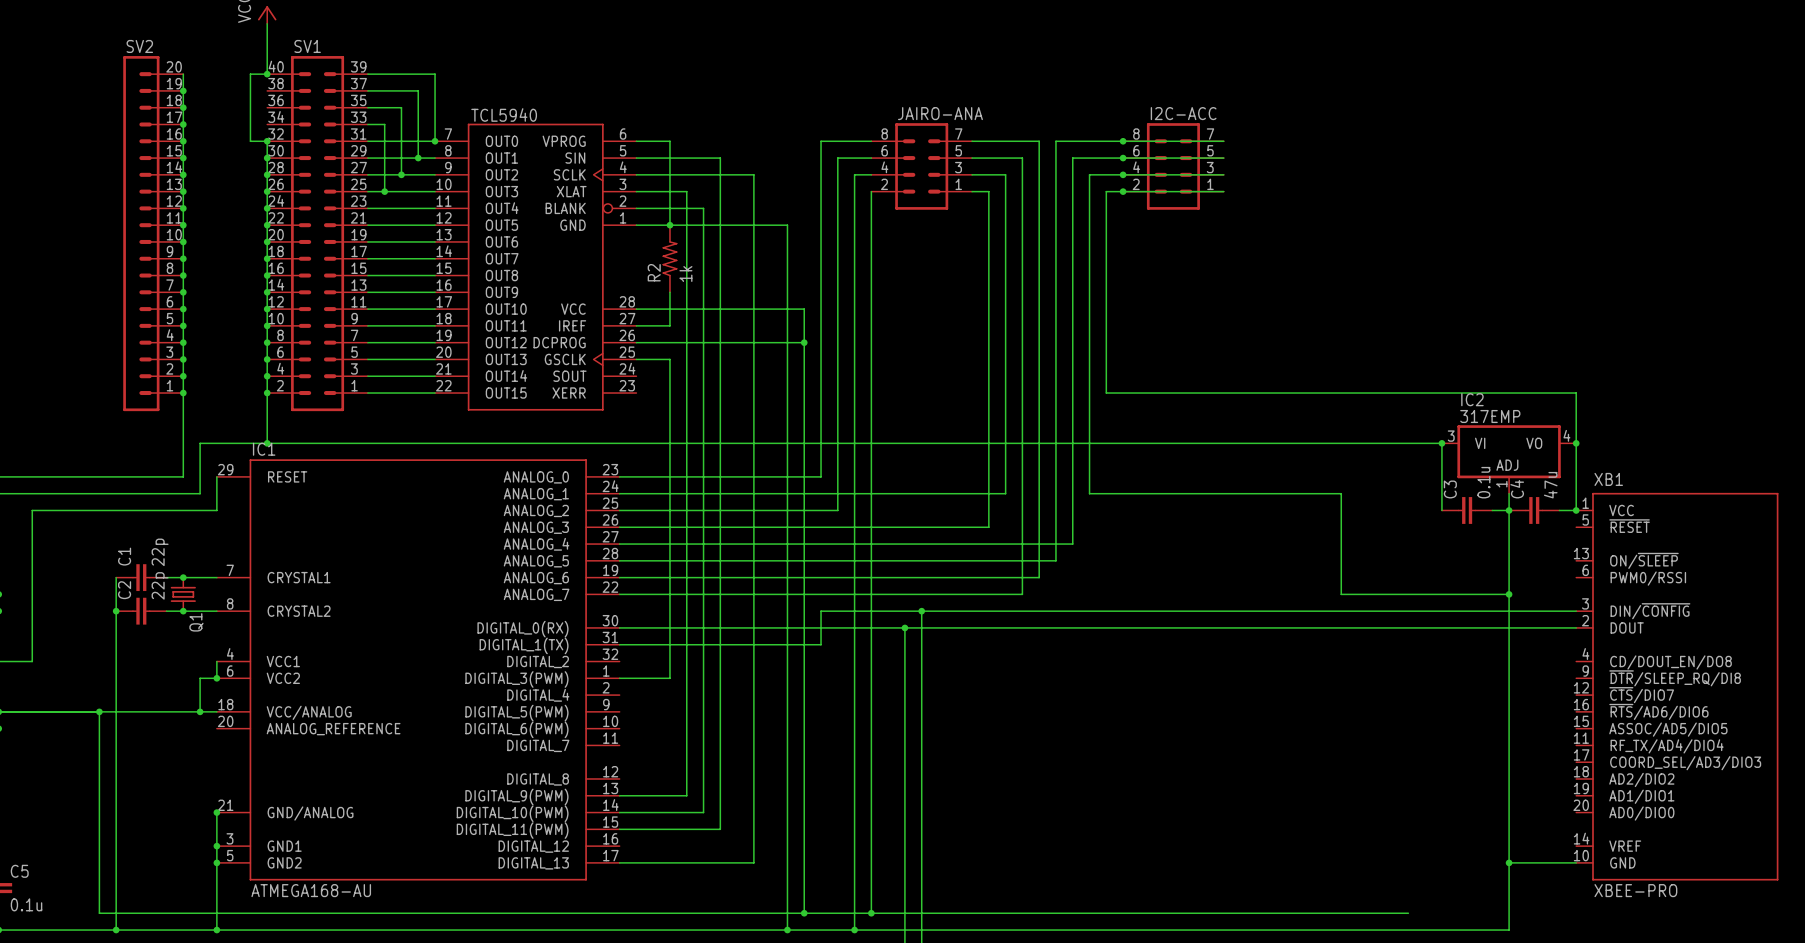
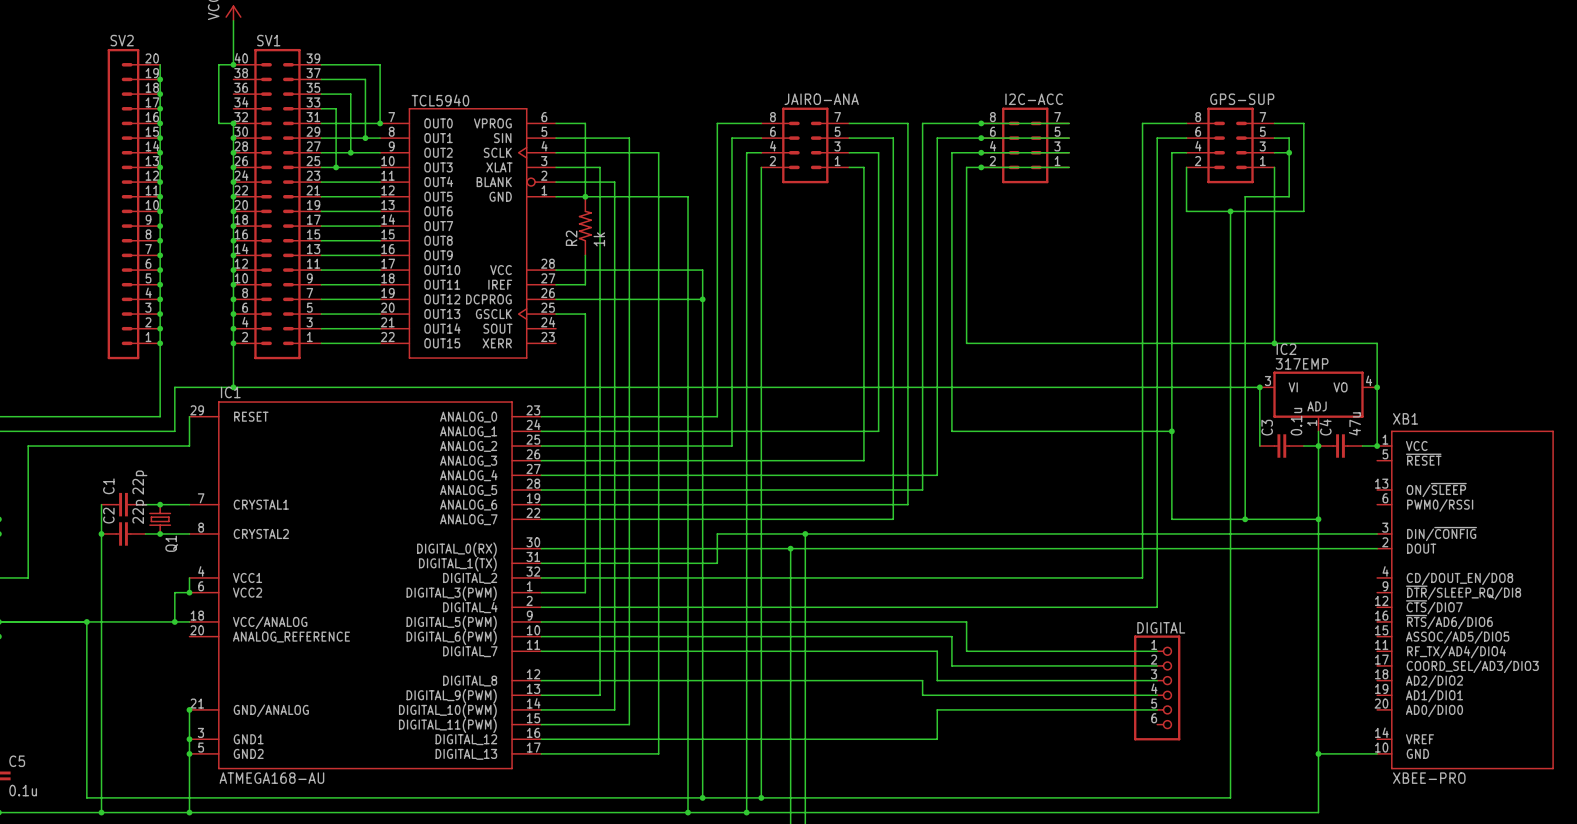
wire: none -> (1186, 123) (1142, 123) (1142, 577) (541, 577)
wire: none -> (1274, 123) (1303, 123) (1303, 211) (1186, 211) (1186, 167)
wire: none -> (1186, 138) (1157, 138) (1157, 607) (541, 607)
wire: none -> (1274, 138) (1289, 138) (1289, 196) (1245, 196) (1245, 519)
GPS-SUP: none -> (1230, 145)
wire: none -> (1186, 152) (1171, 152) (1171, 431)
wire: none -> (1274, 152) (1289, 152)
junction: none -> (1289, 152)
wire: none -> (1274, 167) (1274, 343)
wire: none -> (1230, 211) (1230, 797)
junction: none -> (1230, 211)
junction: none -> (1274, 343)
junction: none -> (1171, 431)
junction: none -> (1245, 519)
wire: none -> (541, 621) (966, 621) (966, 651) (1157, 651)
wire: none -> (541, 636) (951, 636) (951, 665) (1157, 665)
wire: none -> (541, 651) (937, 651) (937, 680) (1157, 680)
wire: none -> (541, 680) (922, 680) (922, 695) (1157, 695)
DIGITAL: none -> (1157, 687)
wire: none -> (1157, 709) (937, 709) (937, 739) (541, 739)

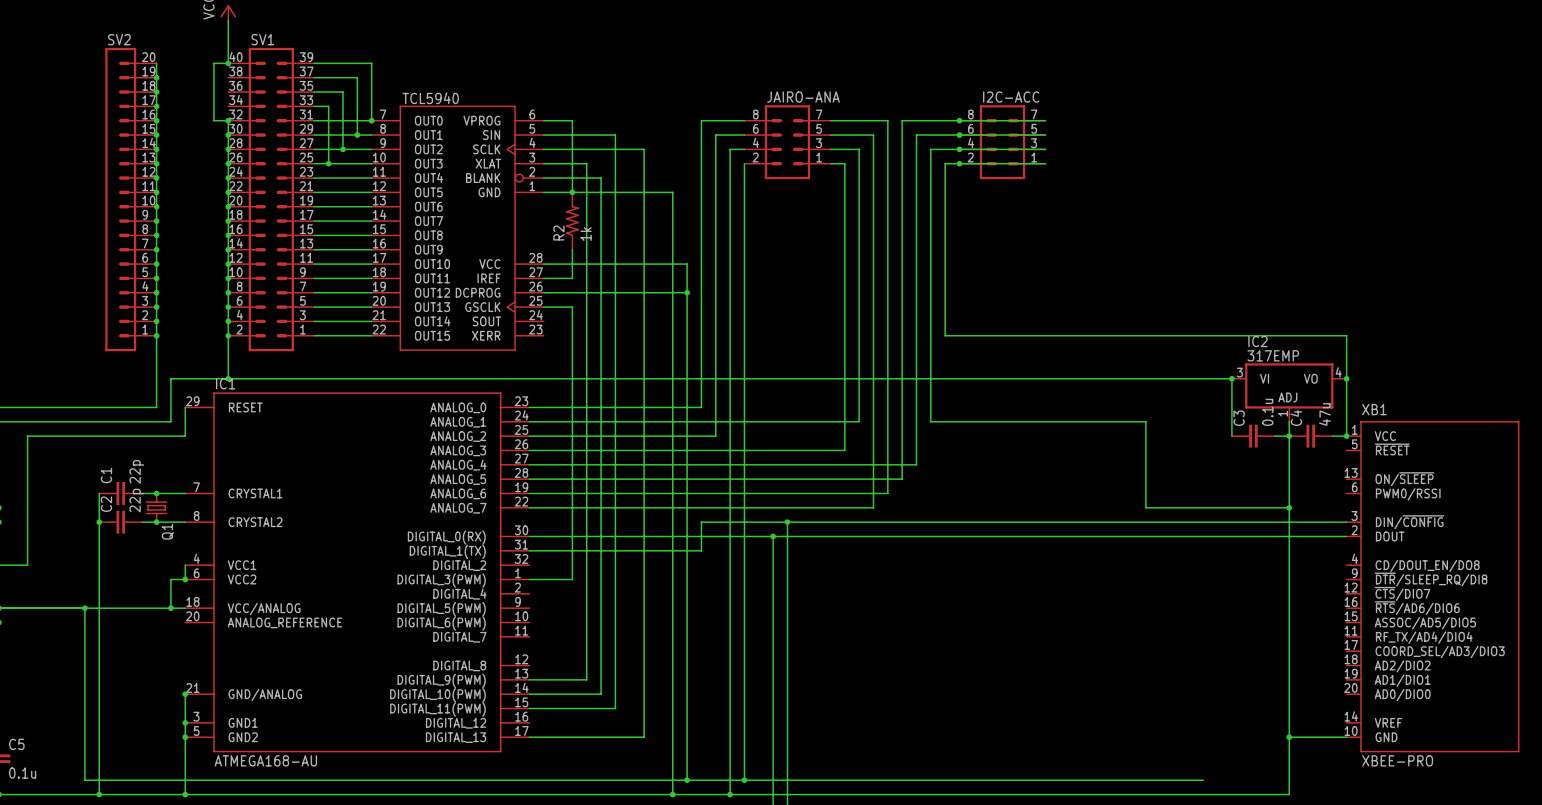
wire: (1186, 123) (1142, 123) (1142, 577) (541, 577) -> none
wire: (1274, 123) (1303, 123) (1303, 211) (1186, 211) (1186, 167) -> none
wire: (1186, 138) (1157, 138) (1157, 607) (541, 607) -> none
wire: (1274, 138) (1289, 138) (1289, 196) (1245, 196) (1245, 519) -> none
GPS-SUP: (1230, 145) -> none
wire: (1186, 152) (1171, 152) (1171, 431) -> none
wire: (1274, 152) (1289, 152) -> none
junction: (1289, 152) -> none
wire: (1274, 167) (1274, 343) -> none
wire: (1230, 211) (1230, 797) -> none
junction: (1230, 211) -> none
junction: (1274, 343) -> none
junction: (1171, 431) -> none
junction: (1245, 519) -> none
wire: (541, 621) (966, 621) (966, 651) (1157, 651) -> none
wire: (541, 636) (951, 636) (951, 665) (1157, 665) -> none
wire: (541, 651) (937, 651) (937, 680) (1157, 680) -> none
wire: (541, 680) (922, 680) (922, 695) (1157, 695) -> none
DIGITAL: (1157, 687) -> none
wire: (1157, 709) (937, 709) (937, 739) (541, 739) -> none

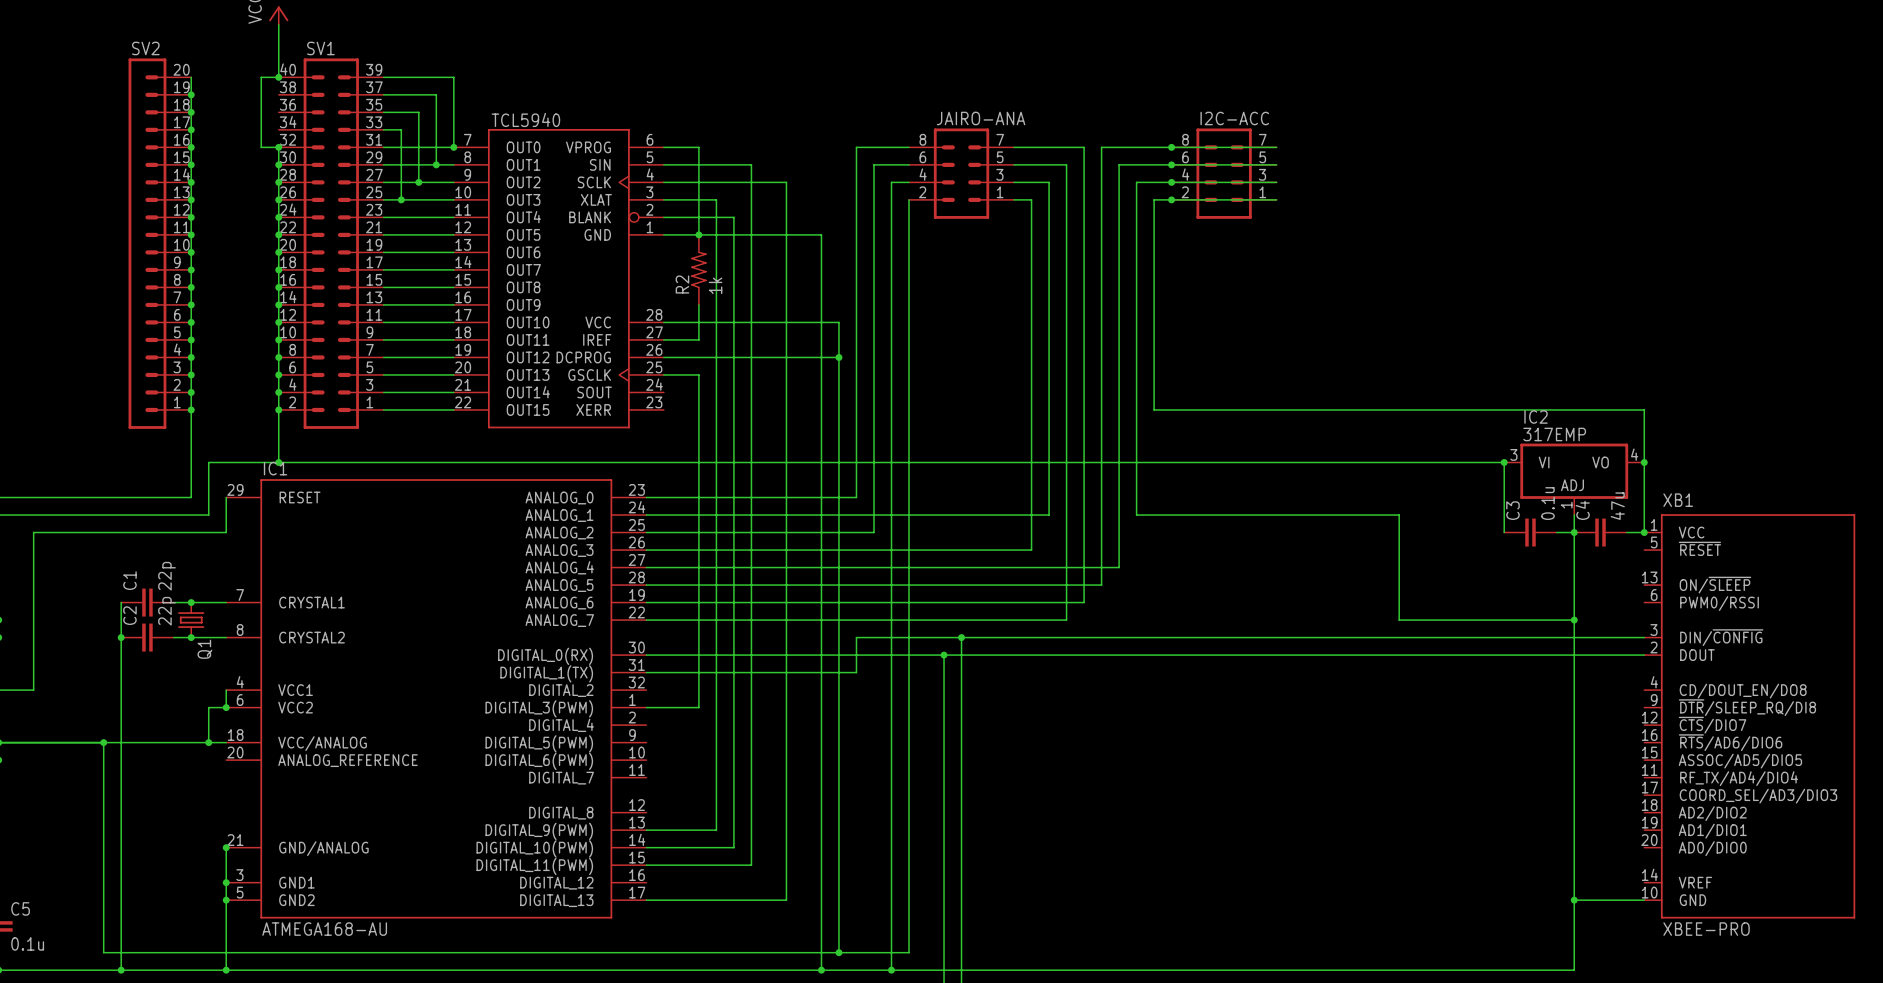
wire: (744, 780) (1203, 780) -> none
junction: (744, 780) -> none

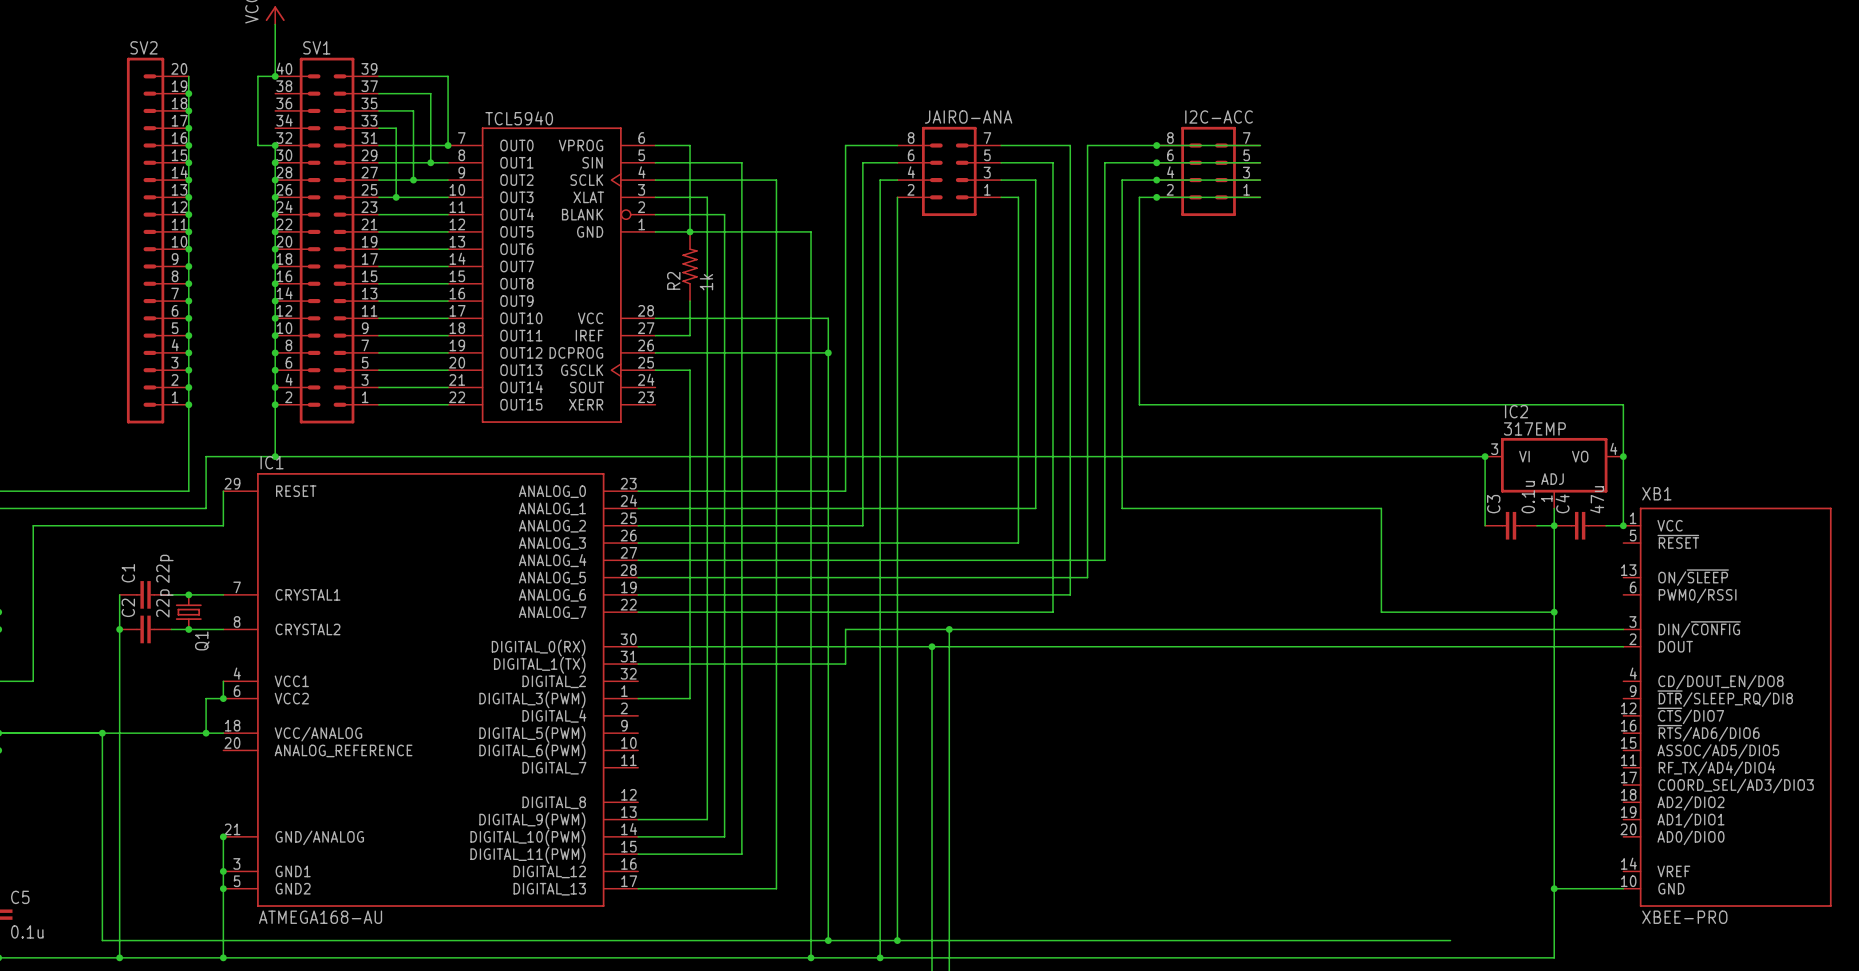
wire: none -> (897, 940) (1450, 940)
junction: none -> (897, 940)

